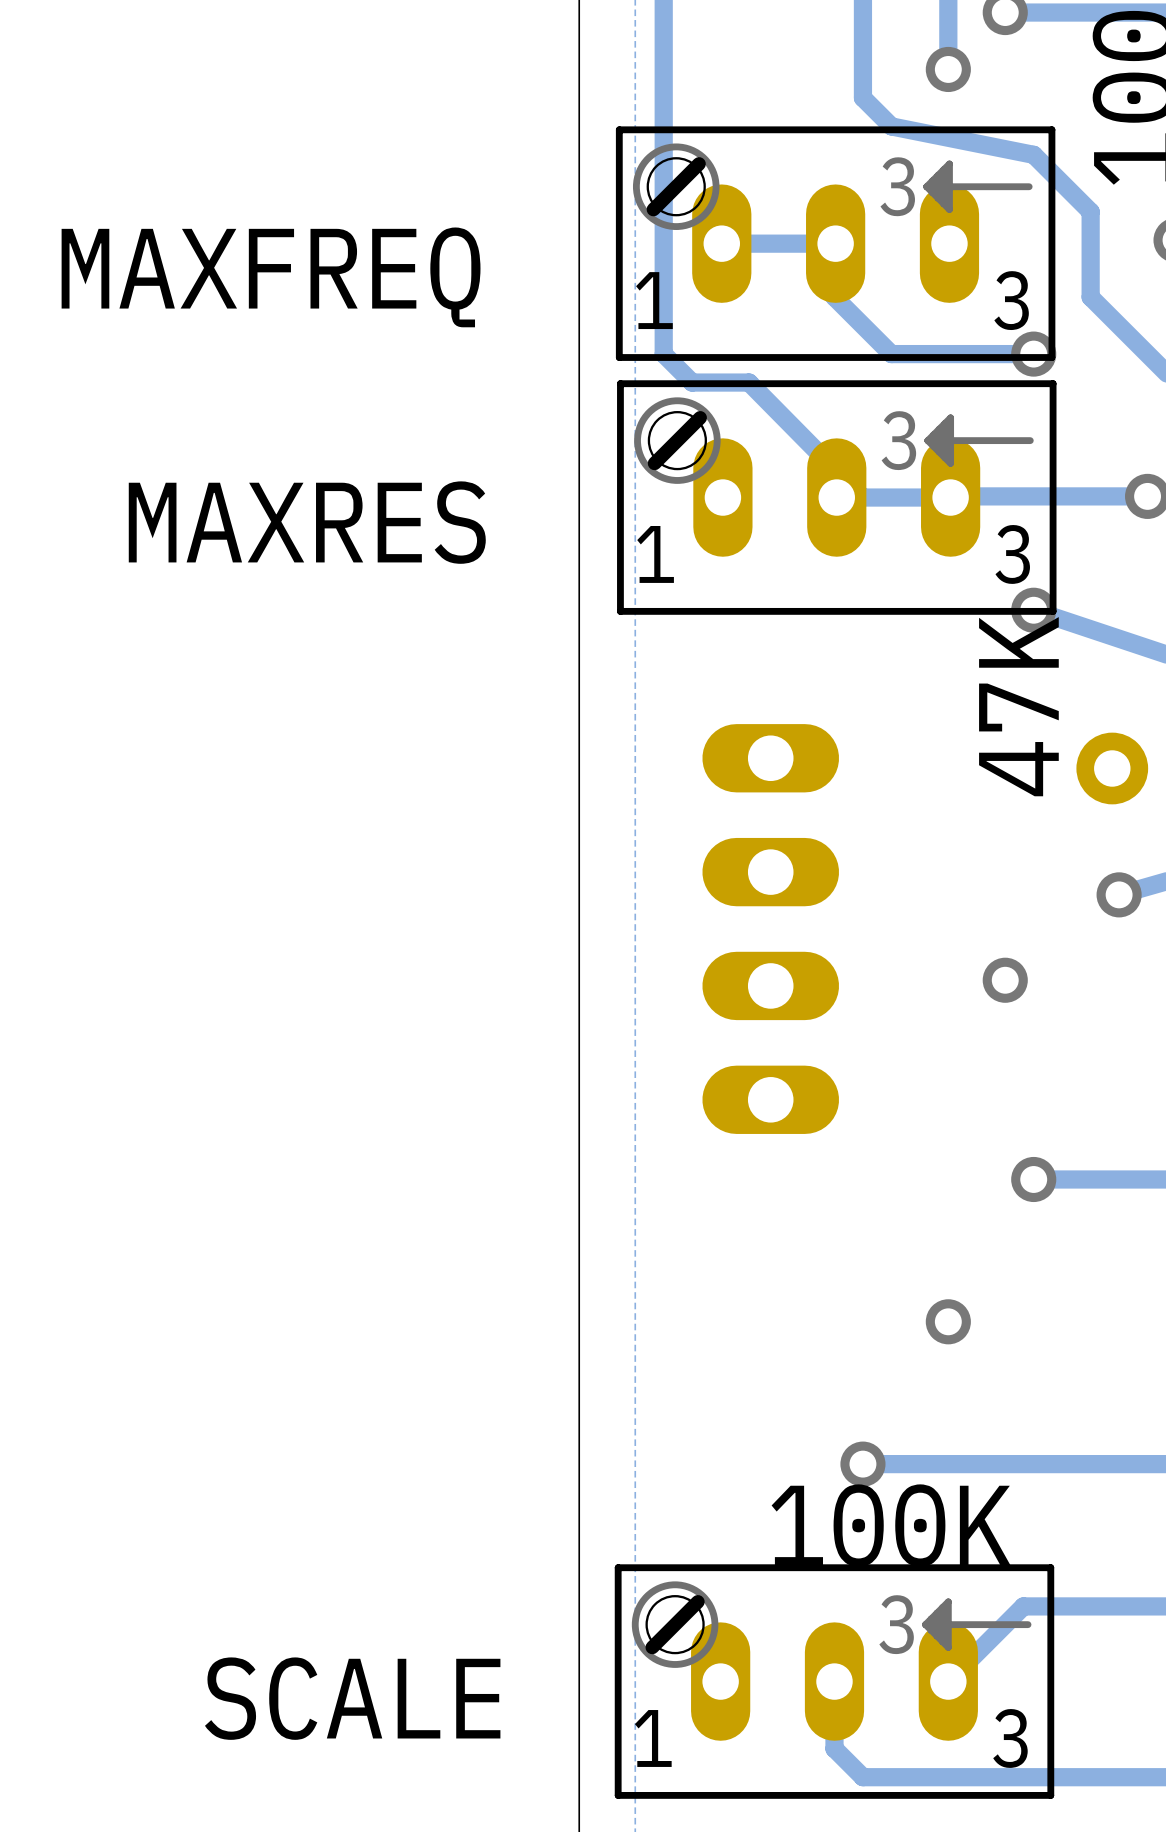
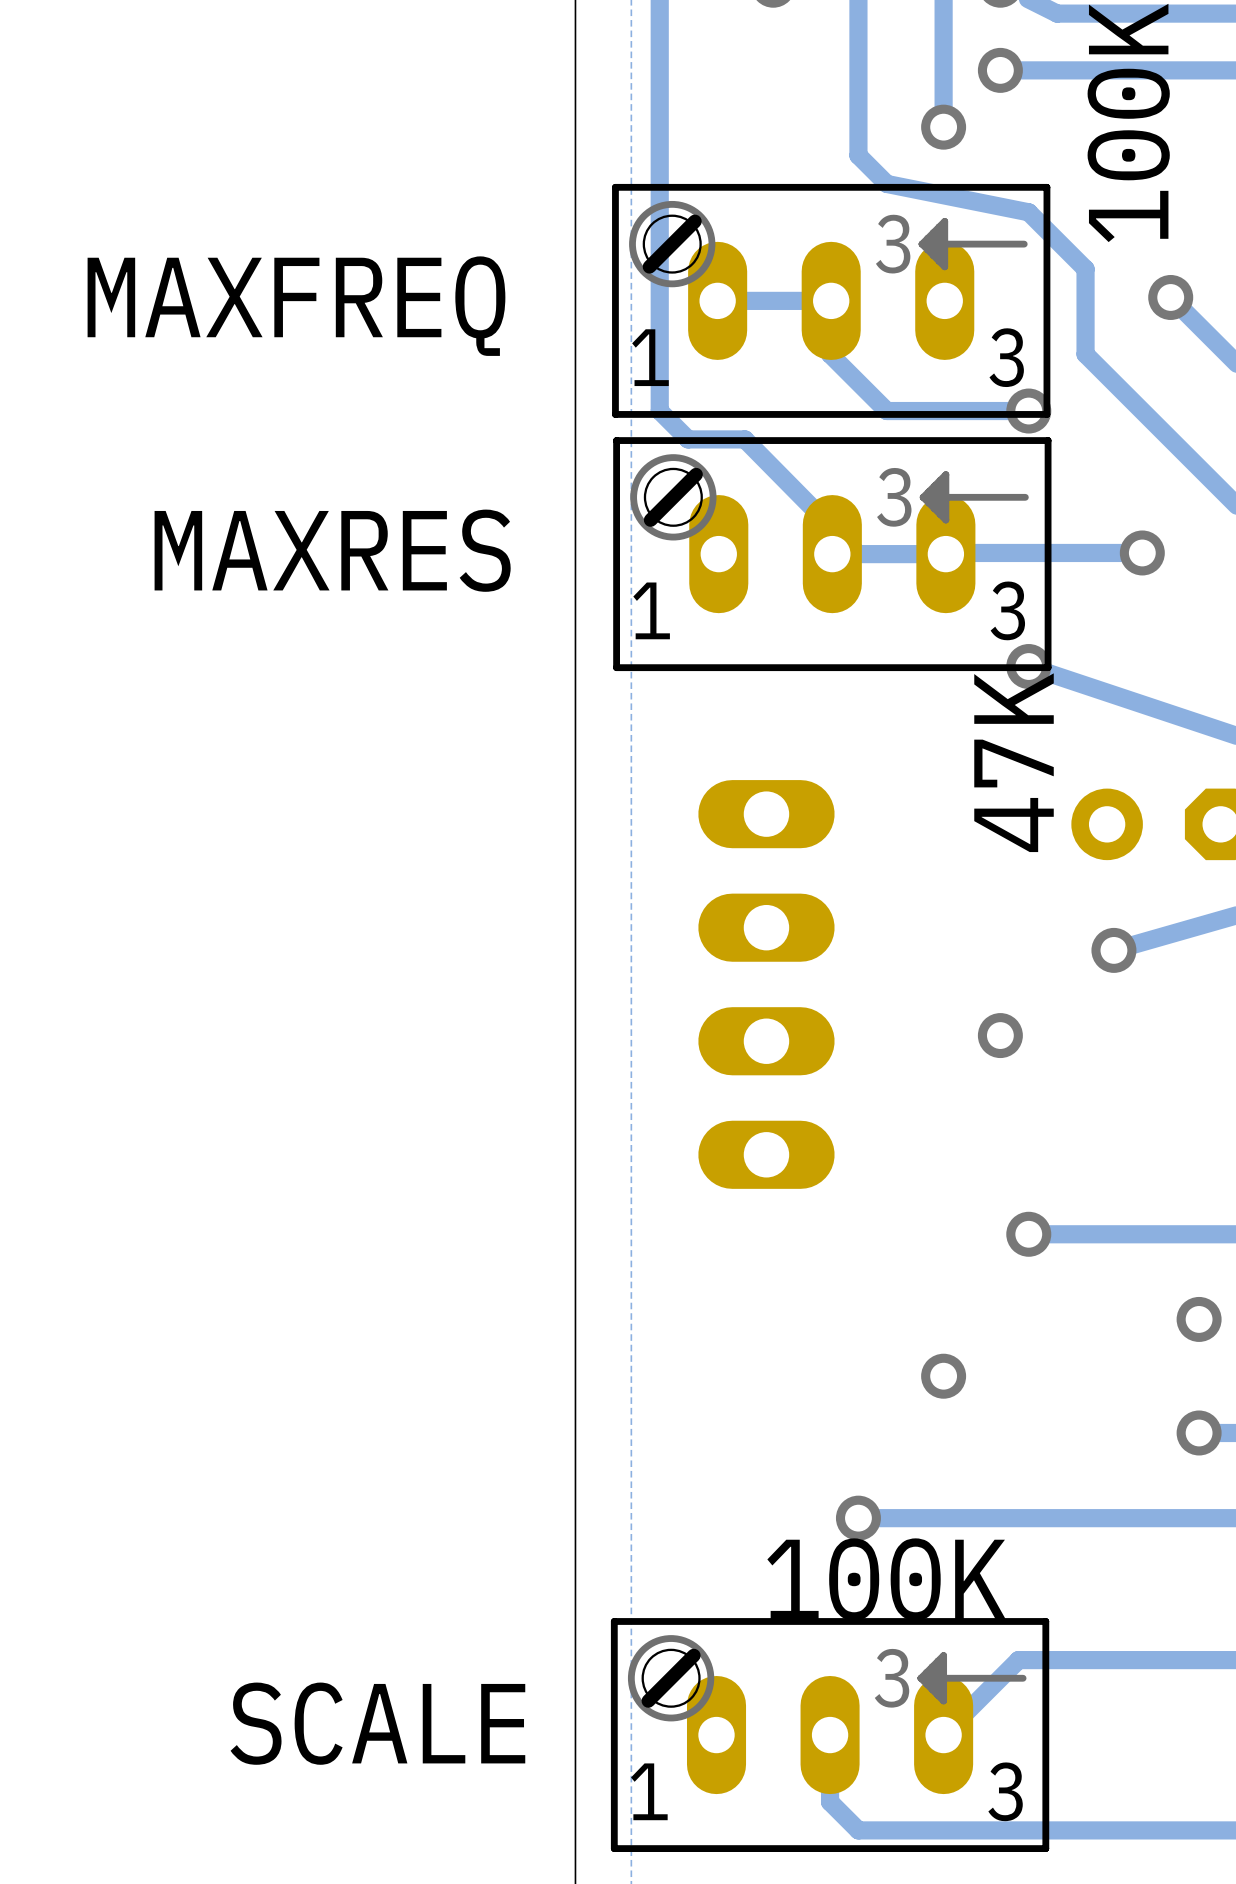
MAXFREQ name position: MAXFREQ (271, 277) -> MAXFREQ (296, 306)
MAXRES name position: MAXRES (307, 522) -> MAXRES (332, 550)
SCALE name position: SCALE (352, 1698) -> SCALE (377, 1723)

